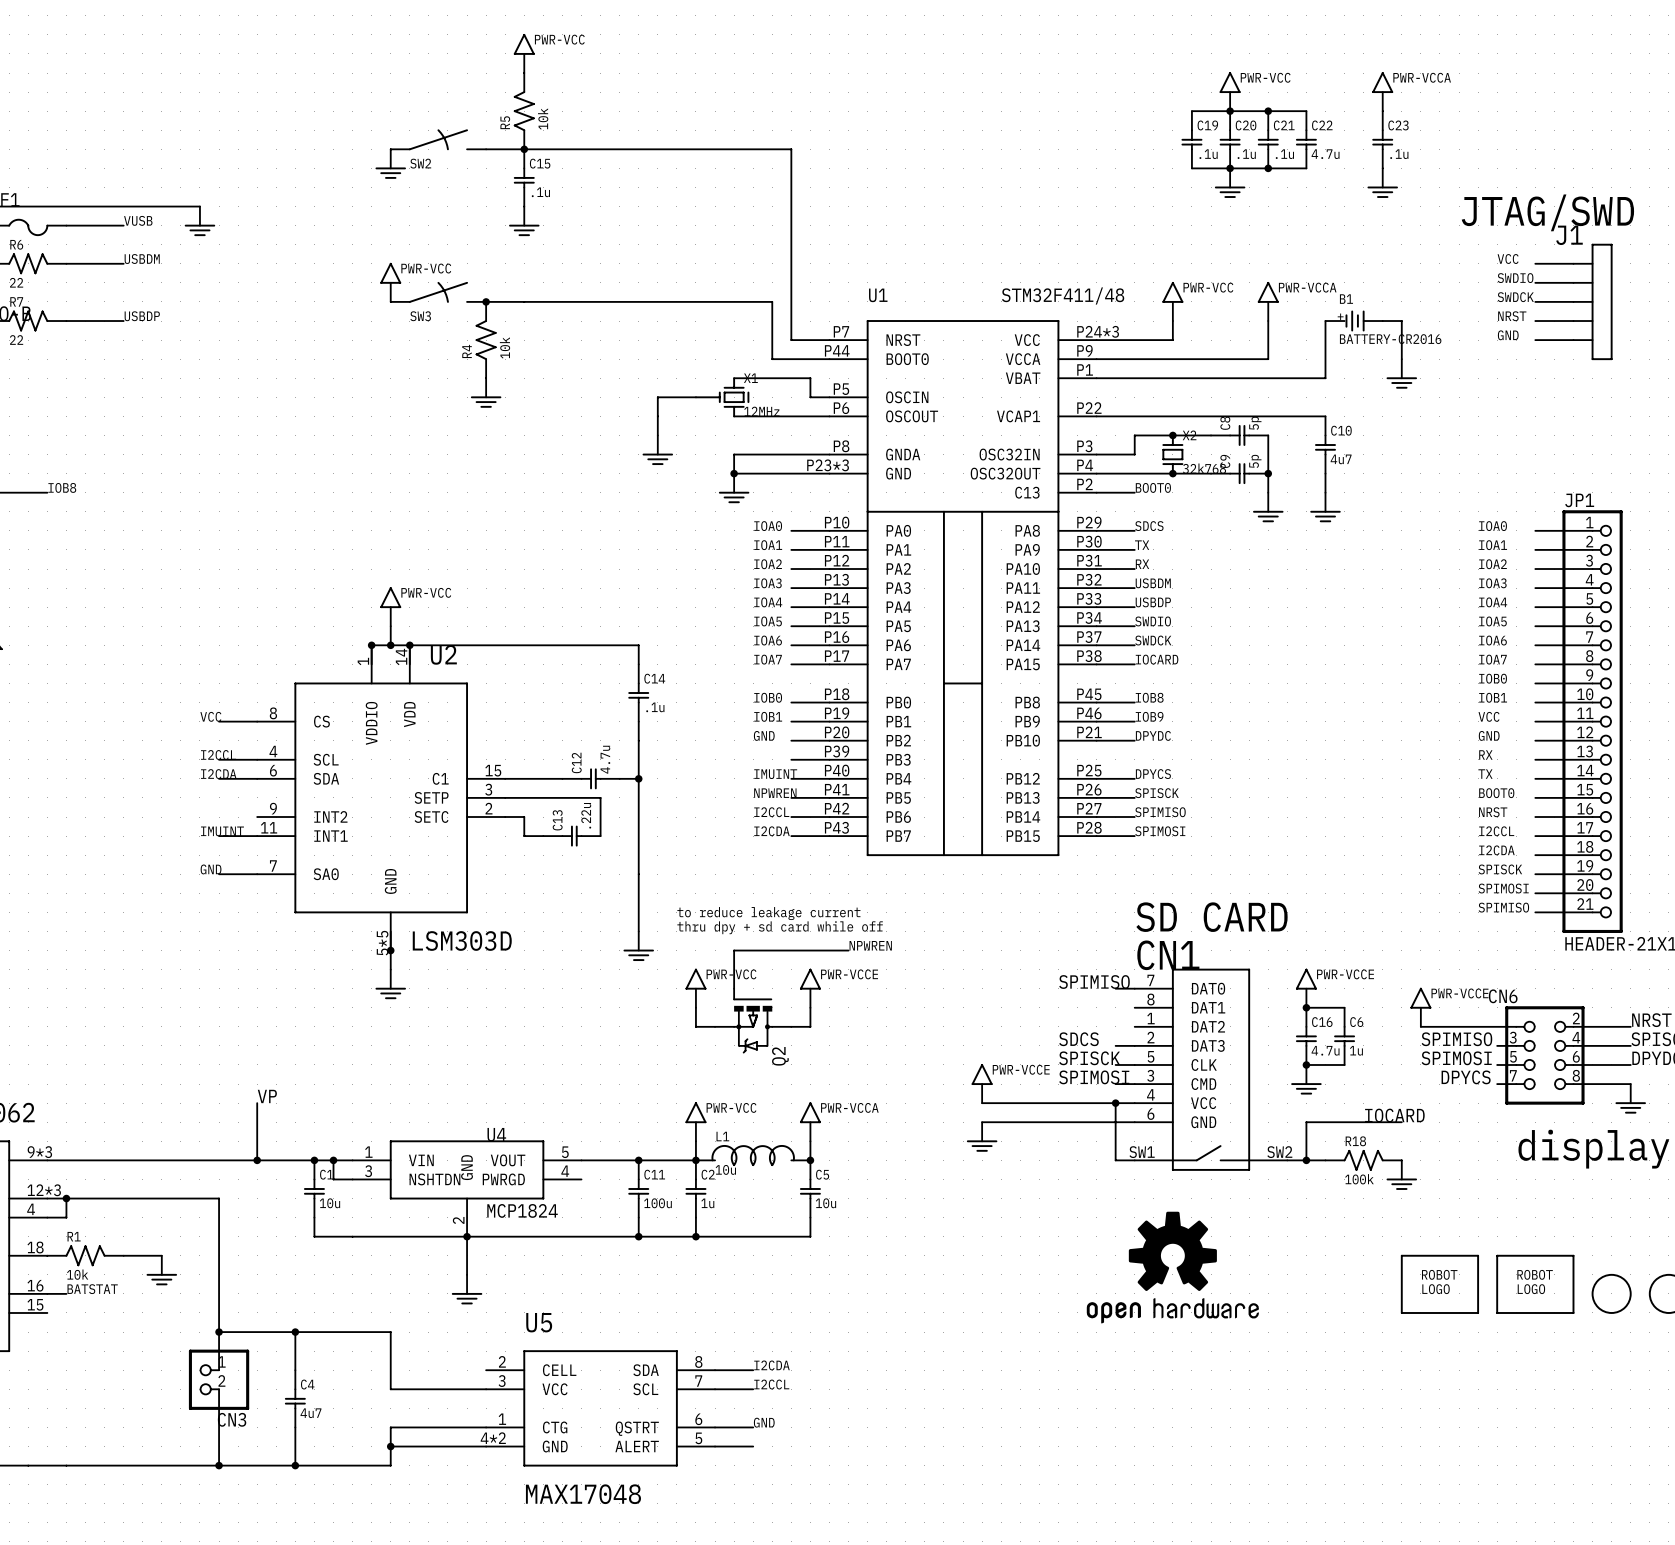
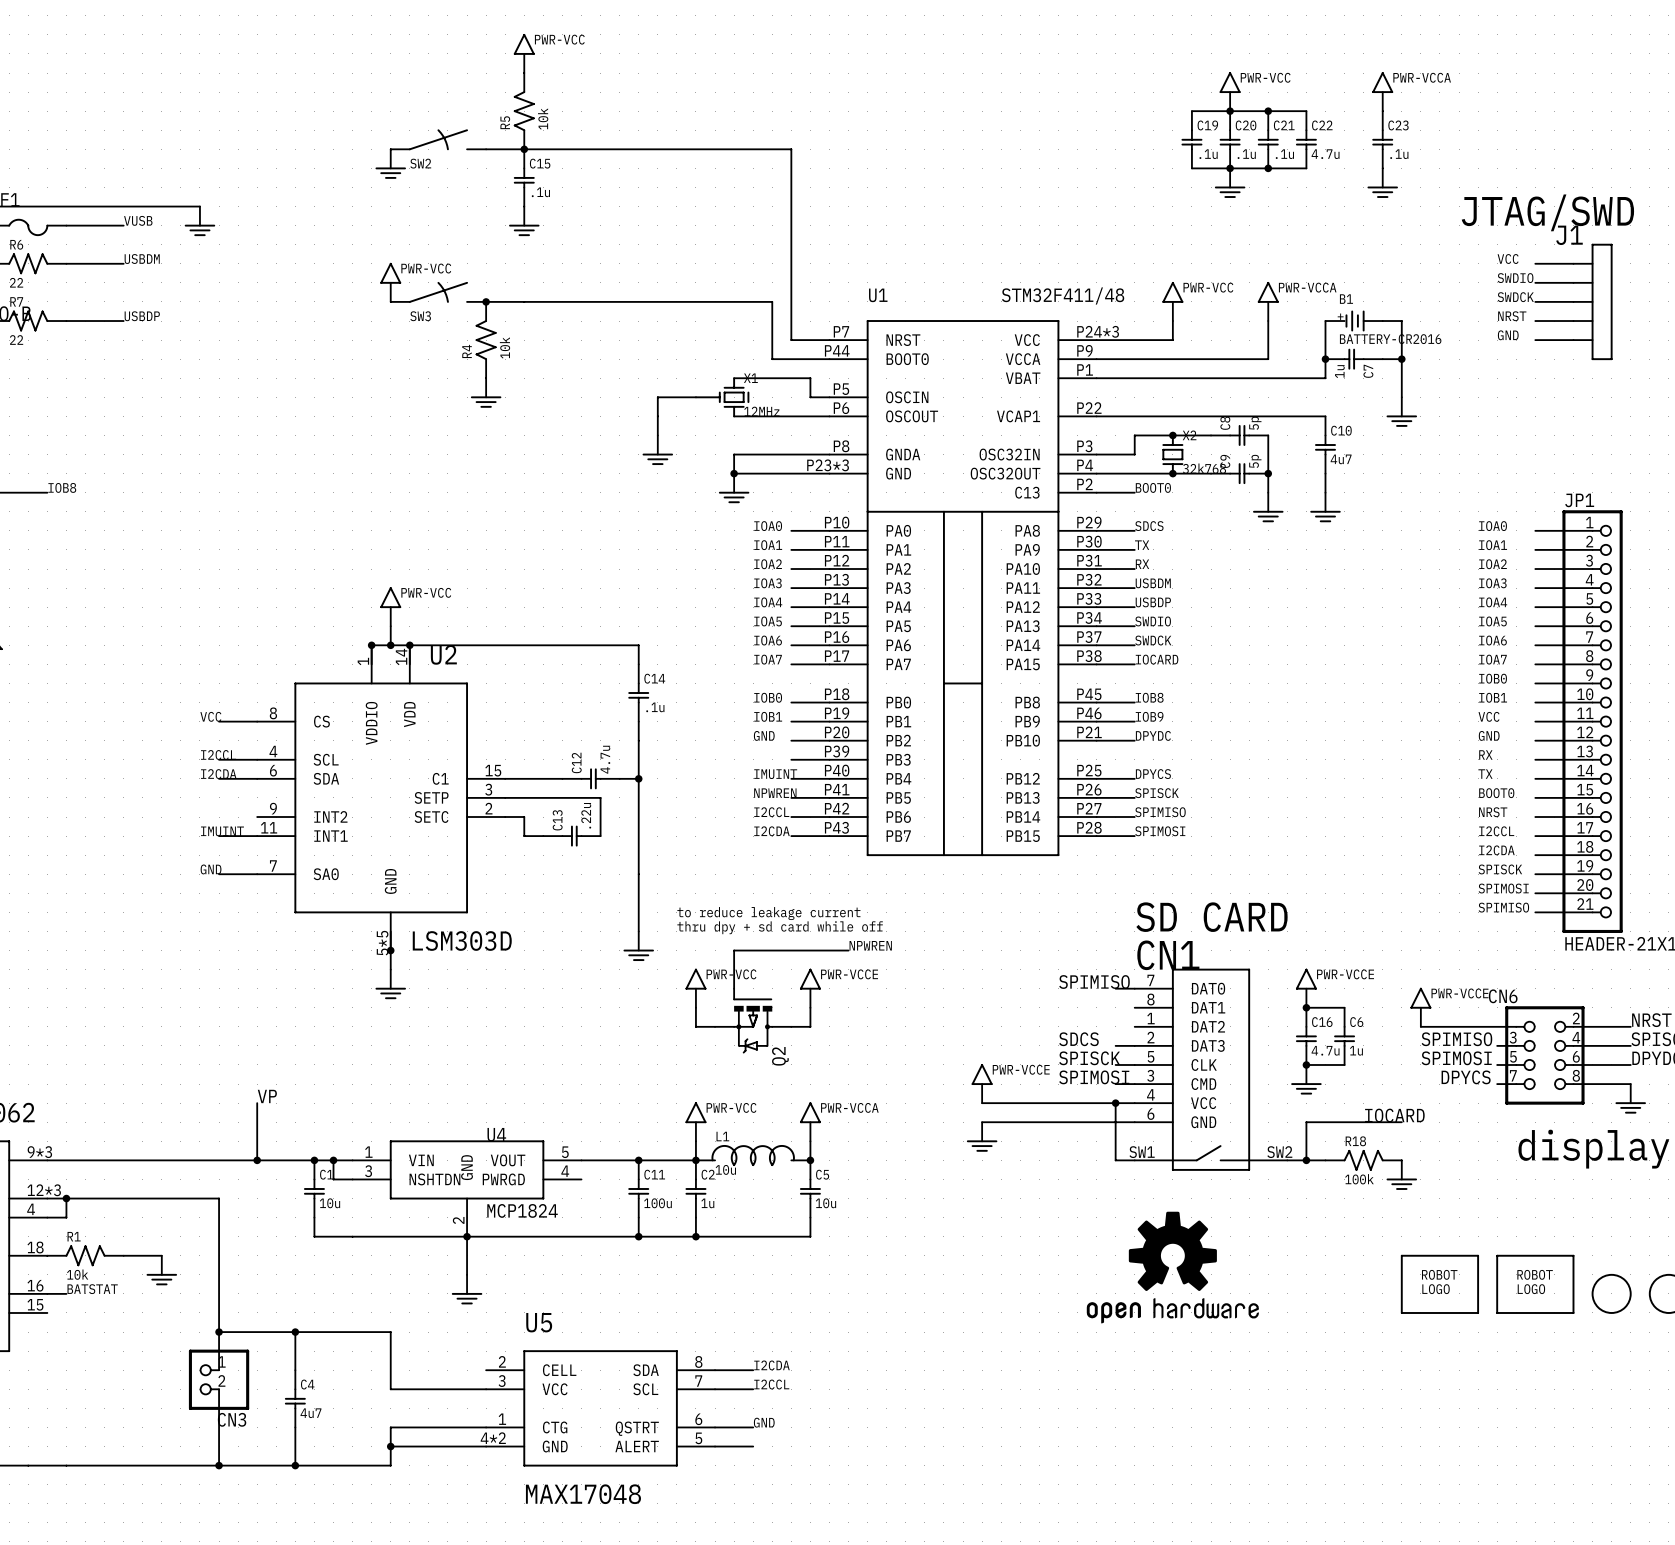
junction: none -> (1325, 359)
C7: none -> 1u (1354, 359)
wire: none -> (1382, 359) (1401, 359) (1401, 397)
junction: none -> (1401, 359)
power symbol position: (1401, 373) -> (1401, 412)

